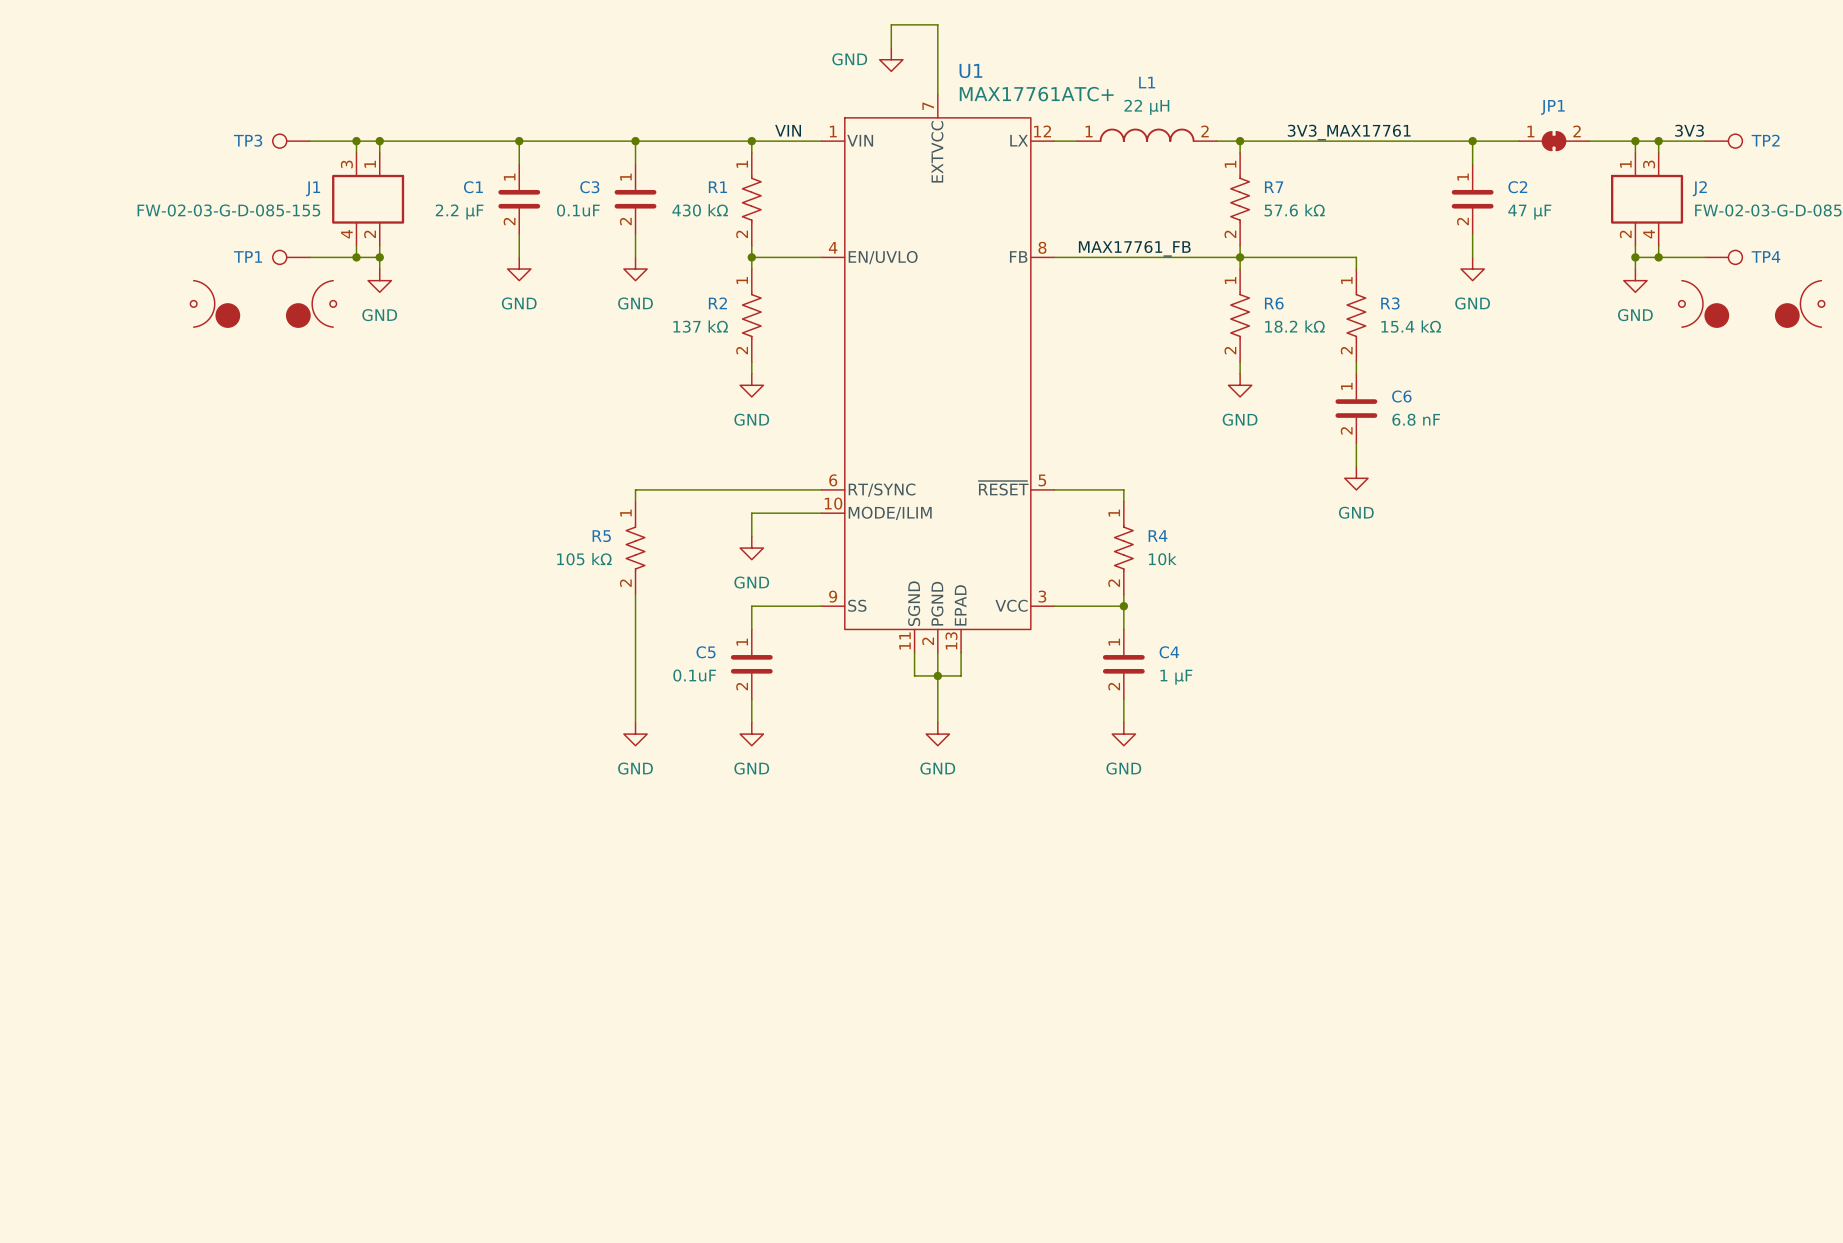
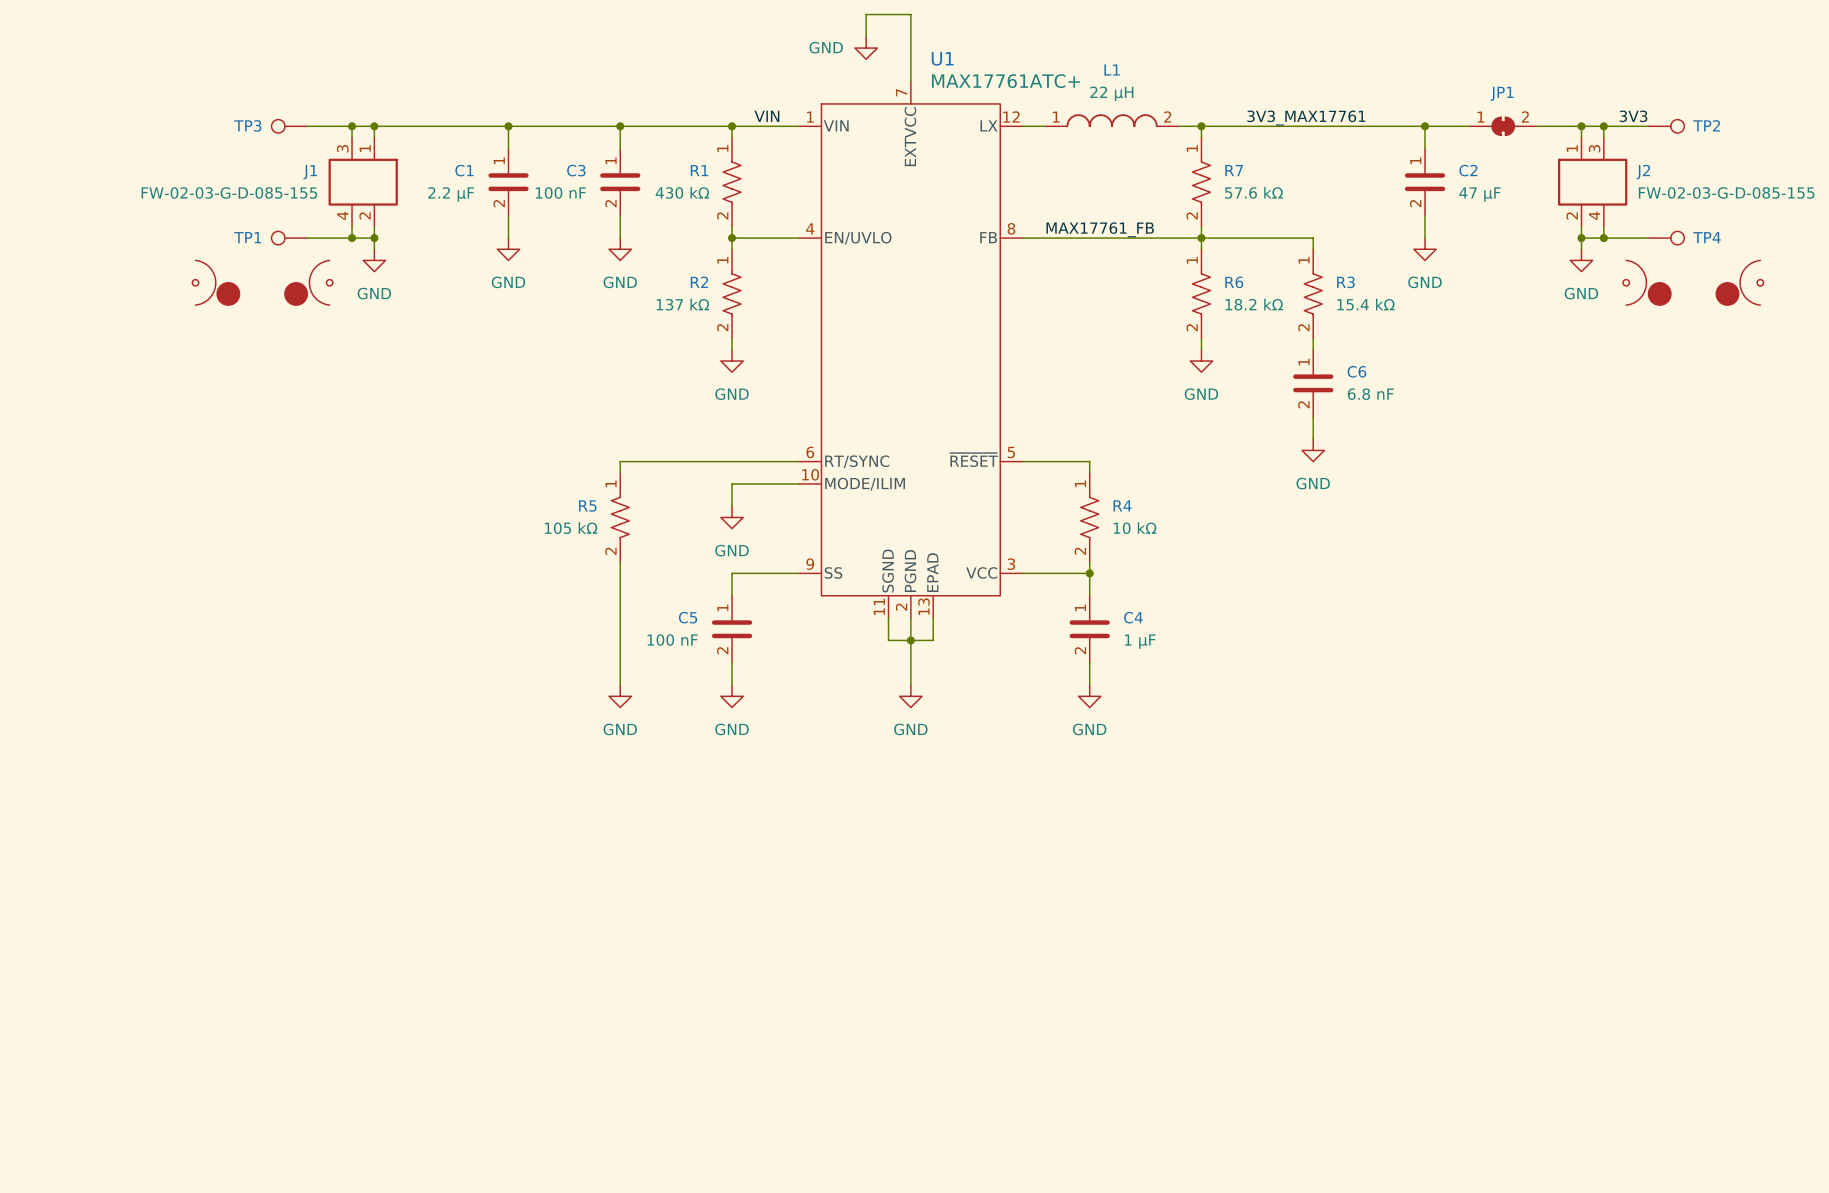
C3 value: 0.1uF (578, 210) -> 100 nF (560, 192)
R4 value: 10k (1162, 559) -> 10 kΩ (1135, 528)
C5 value: 0.1uF (694, 675) -> 100 nF (672, 640)

